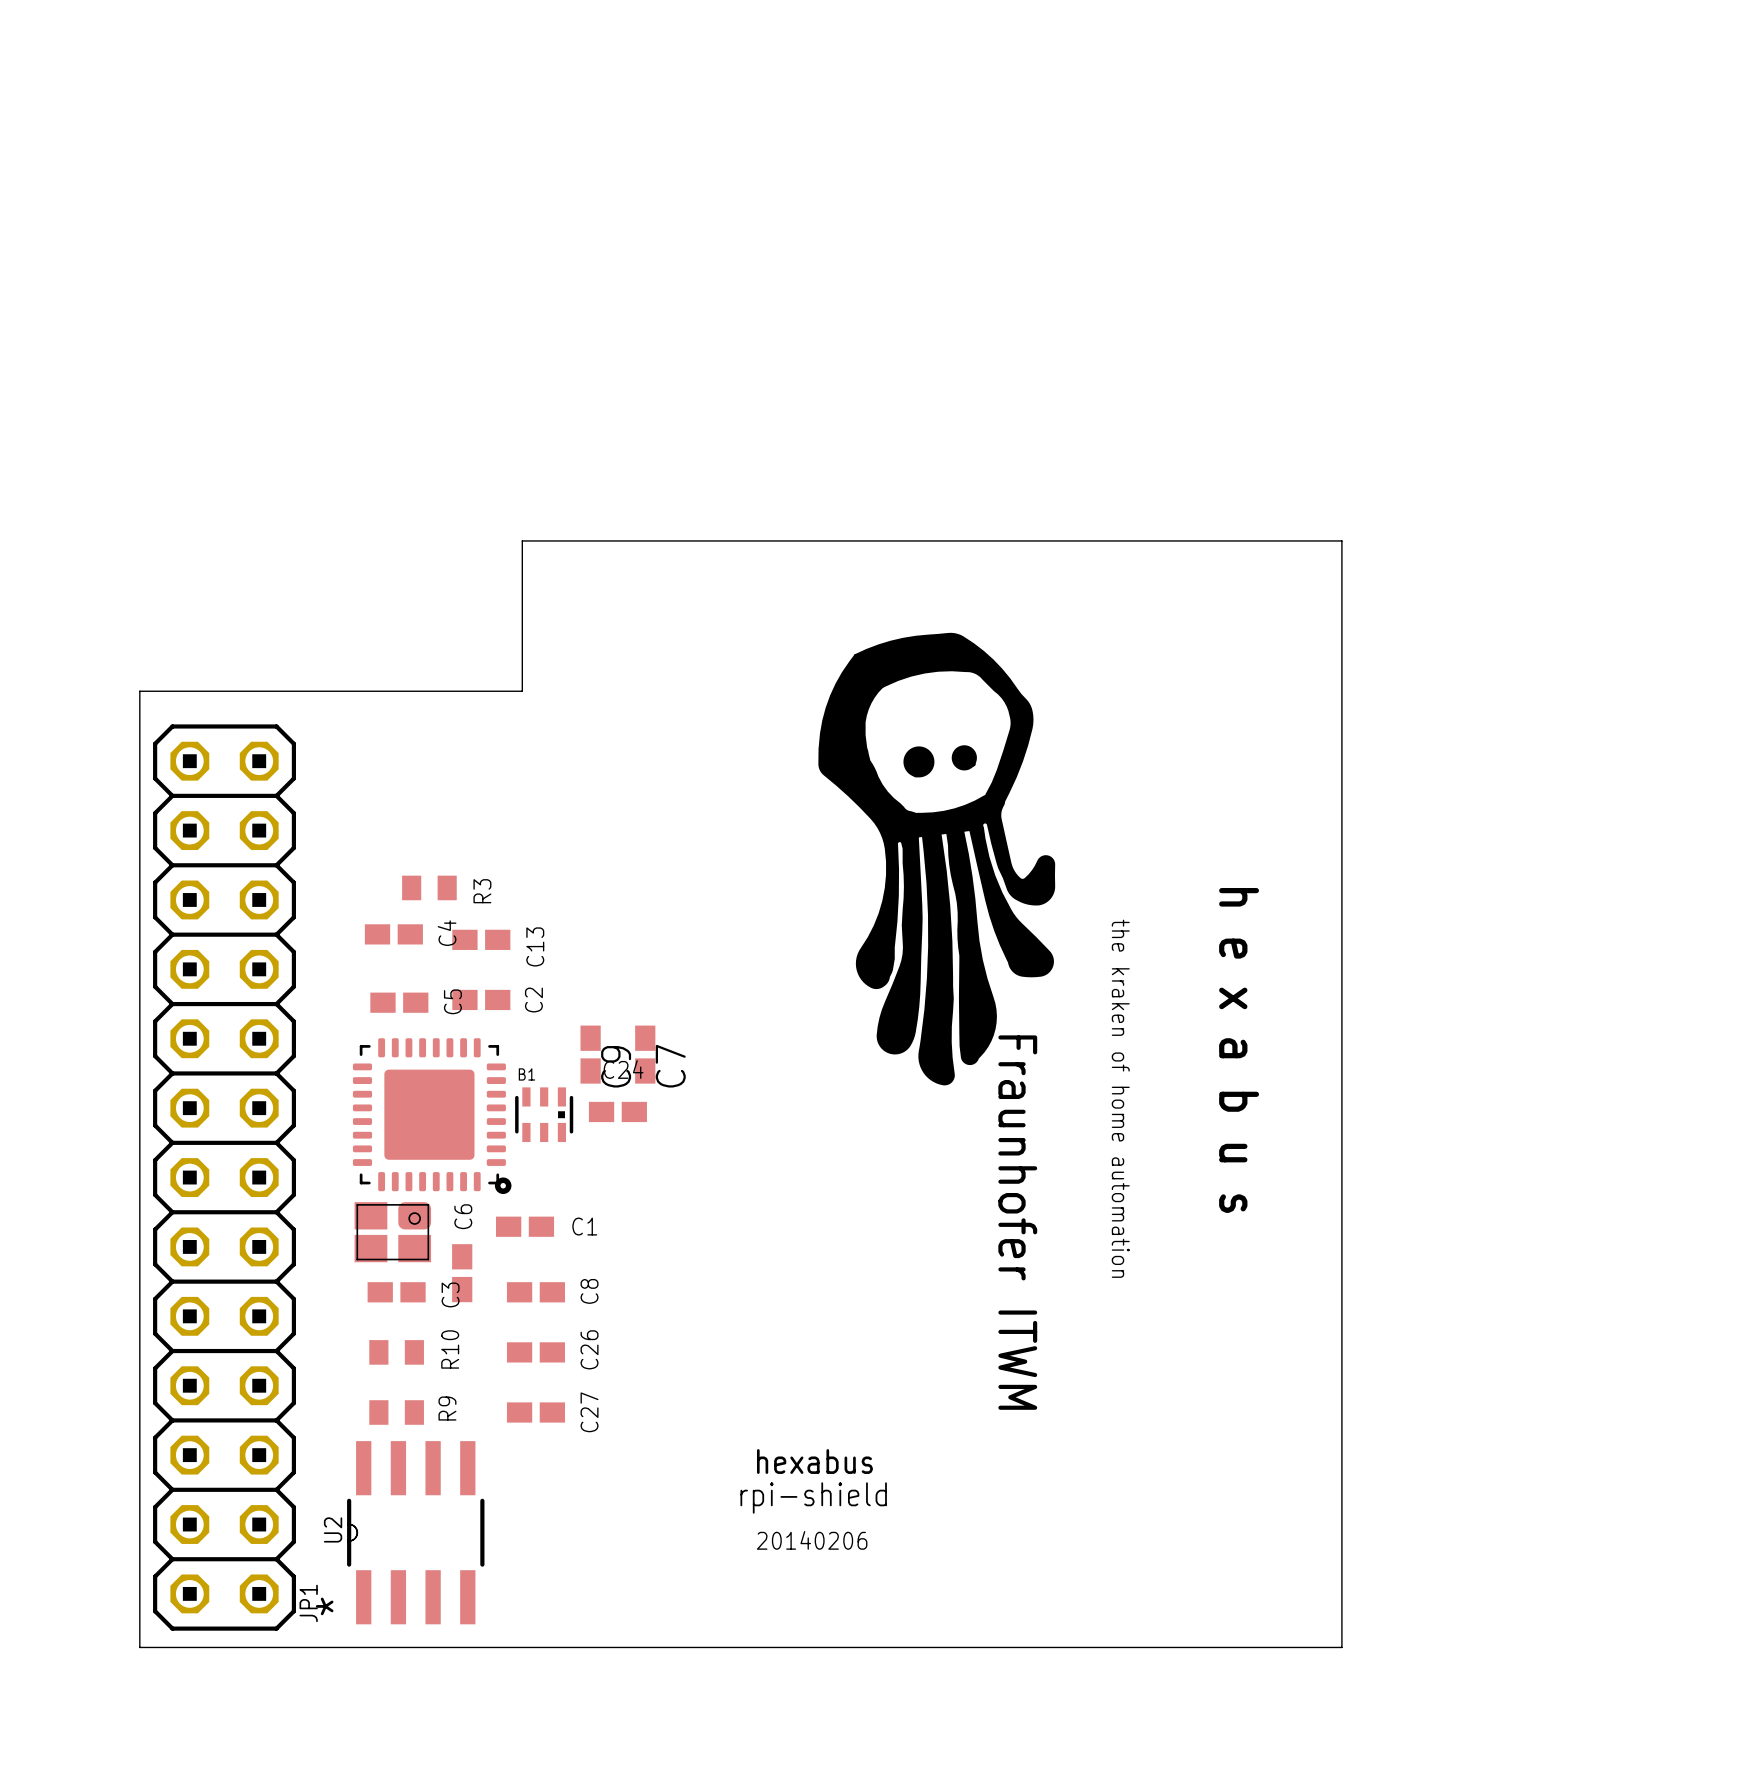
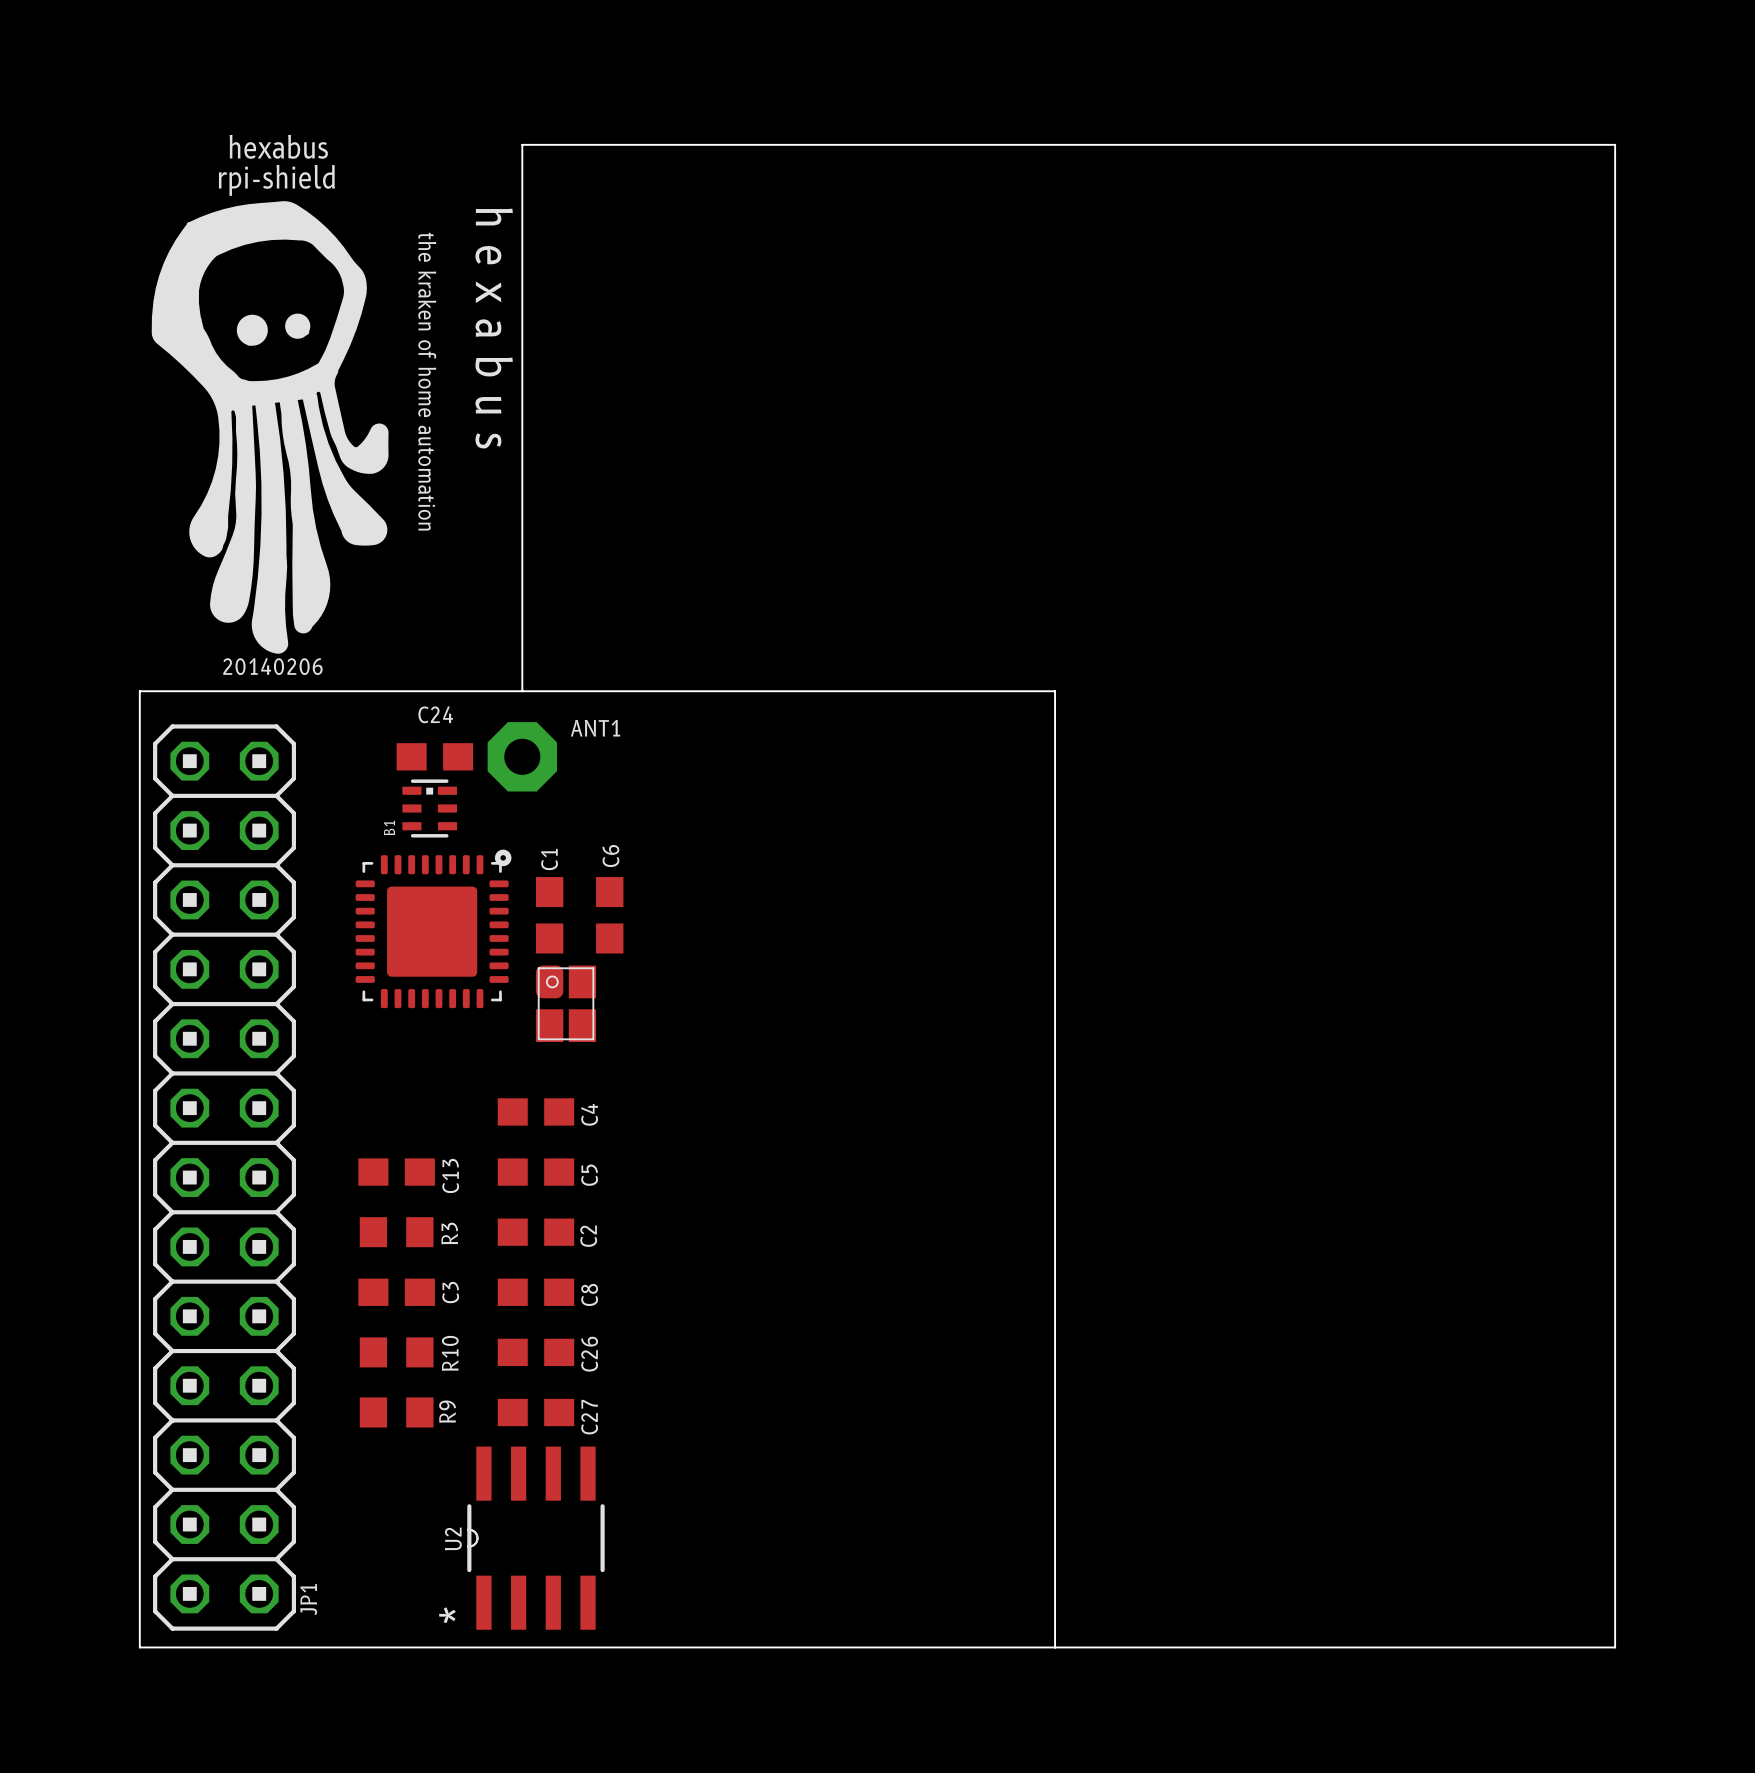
text: none -> hexabus (278, 146)
text: none -> rpi-shield (276, 180)
drawing: none -> [151, 201, 389, 654]
text: none -> h e x a b u s (494, 328)
text: none -> the kraken of home automation (427, 381)
board edge: (522, 540) (1341, 540) (1341, 1647) -> (522, 540) (522, 144) (1615, 144) (1615, 1647) (1341, 1647)
drawing: [818, 632, 1056, 1086] -> none
text: none -> 20140206 (272, 666)
board edge: none -> (522, 691) (1055, 691) (1055, 1647)
ANT1: none -> (522, 756)
R3 footprint: [402, 875, 457, 901] -> [359, 1217, 434, 1248]
C4 footprint: [364, 924, 423, 945] -> [497, 1098, 575, 1126]
C13 footprint: [452, 929, 511, 950] -> [358, 1158, 435, 1186]
C2 footprint: [452, 989, 511, 1011] -> [497, 1218, 575, 1246]
C5 footprint: [370, 992, 429, 1013] -> [497, 1158, 575, 1186]
text: h e x a b u s (1239, 1050) -> none
C9: (590, 1054) -> none
C7: (645, 1054) -> none
text: the kraken of home automation (1120, 1098) -> none
C24 footprint: [588, 1101, 647, 1123] -> [396, 743, 474, 771]
B1 rotation: 0° (544, 1114) -> 90° counterclockwise (429, 808)
B1 position: (544, 1114) -> (429, 808)
part rotation: 0° (432, 1116) -> 90° counterclockwise (433, 928)
part position: (432, 1116) -> (433, 928)
C1 footprint: [496, 1216, 555, 1237] -> [535, 877, 564, 954]
text: Fraunhofer ITWM (1017, 1222) -> none
C1 name position: C1 (584, 1226) -> C1 (549, 859)
part rotation: 0° (392, 1232) -> 90° counterclockwise (566, 1003)
part position: (392, 1232) -> (566, 1003)
C6 footprint: [452, 1244, 473, 1303] -> [596, 877, 624, 954]
C3 footprint: [367, 1282, 426, 1303] -> [358, 1278, 435, 1306]
C8 footprint: [506, 1282, 566, 1303] -> [497, 1278, 575, 1306]
R10 footprint: [369, 1340, 424, 1365] -> [359, 1337, 434, 1368]
C26 footprint: [506, 1342, 566, 1363] -> [497, 1338, 575, 1367]
R9 footprint: [369, 1400, 424, 1425] -> [359, 1397, 434, 1428]
C27 footprint: [506, 1402, 566, 1423] -> [497, 1398, 575, 1427]
text: hexabus (814, 1461) -> none
text: rpi-shield (813, 1497) -> none
U2 position: (415, 1532) -> (535, 1538)
text: 20140206 (812, 1540) -> none

